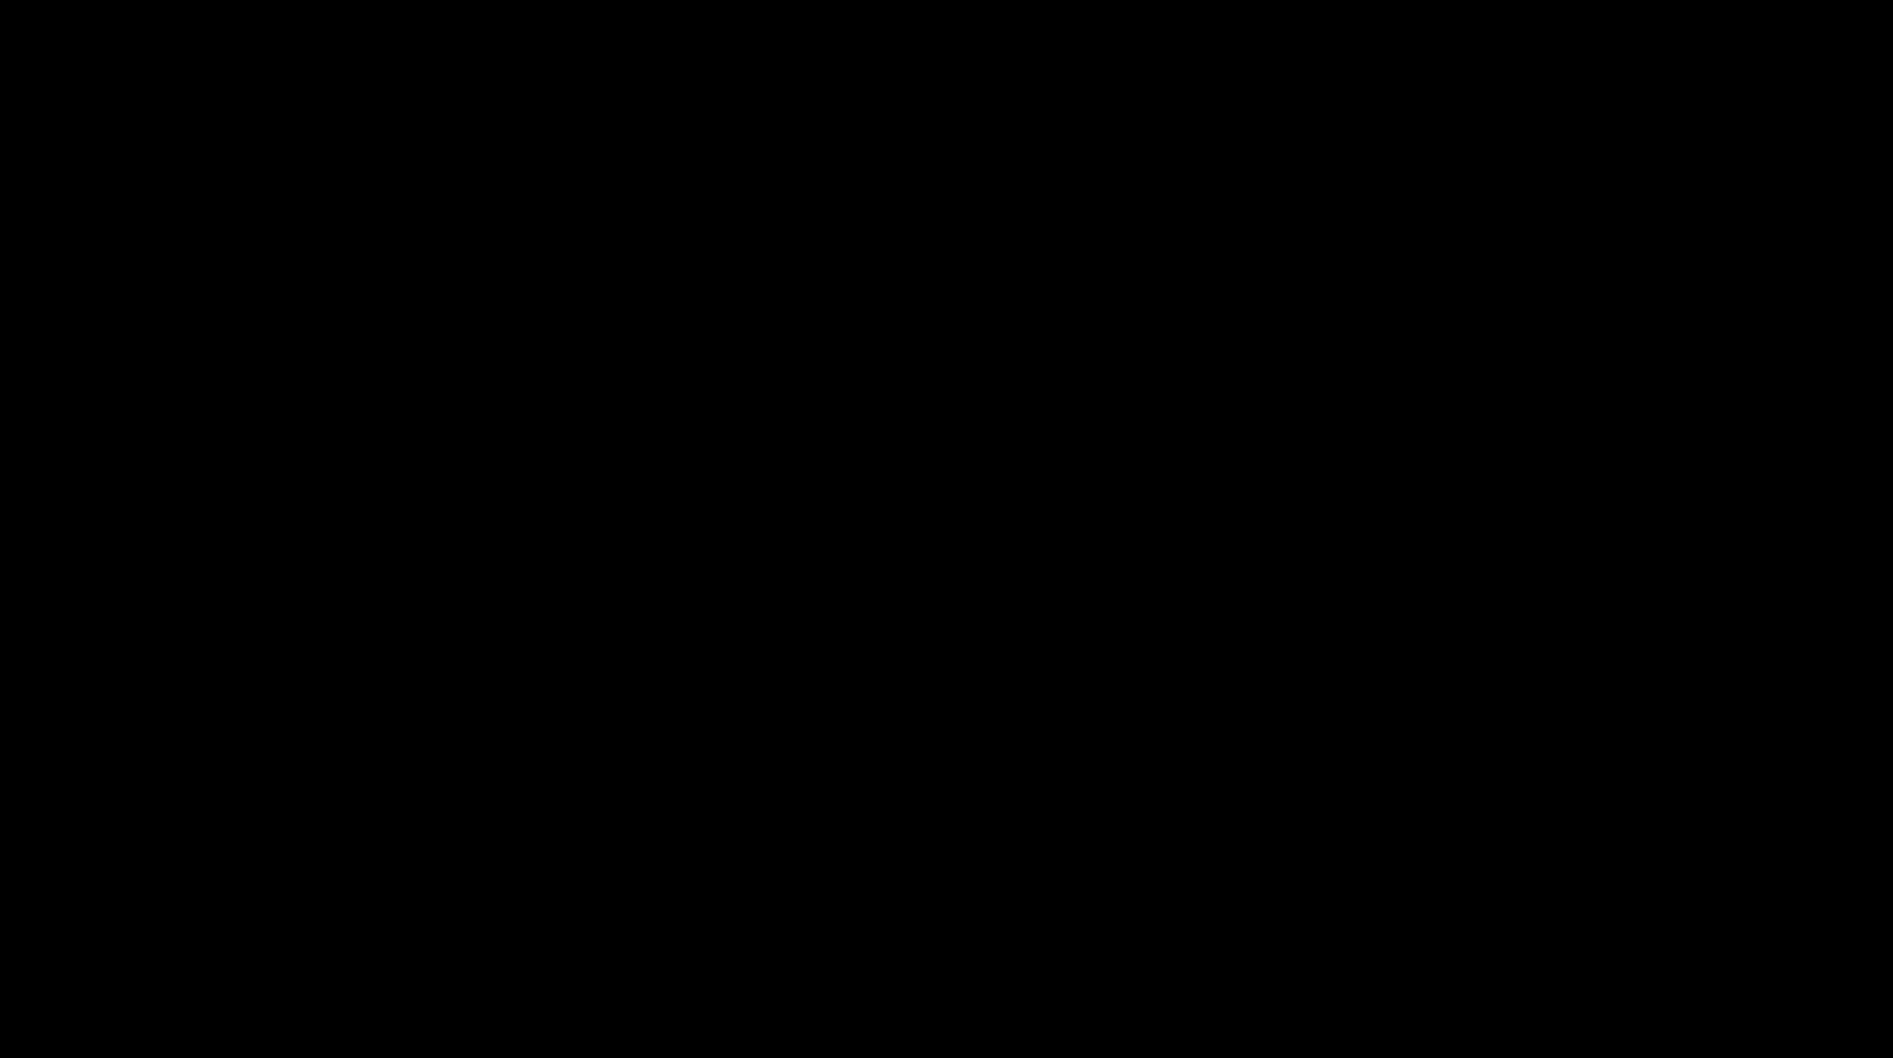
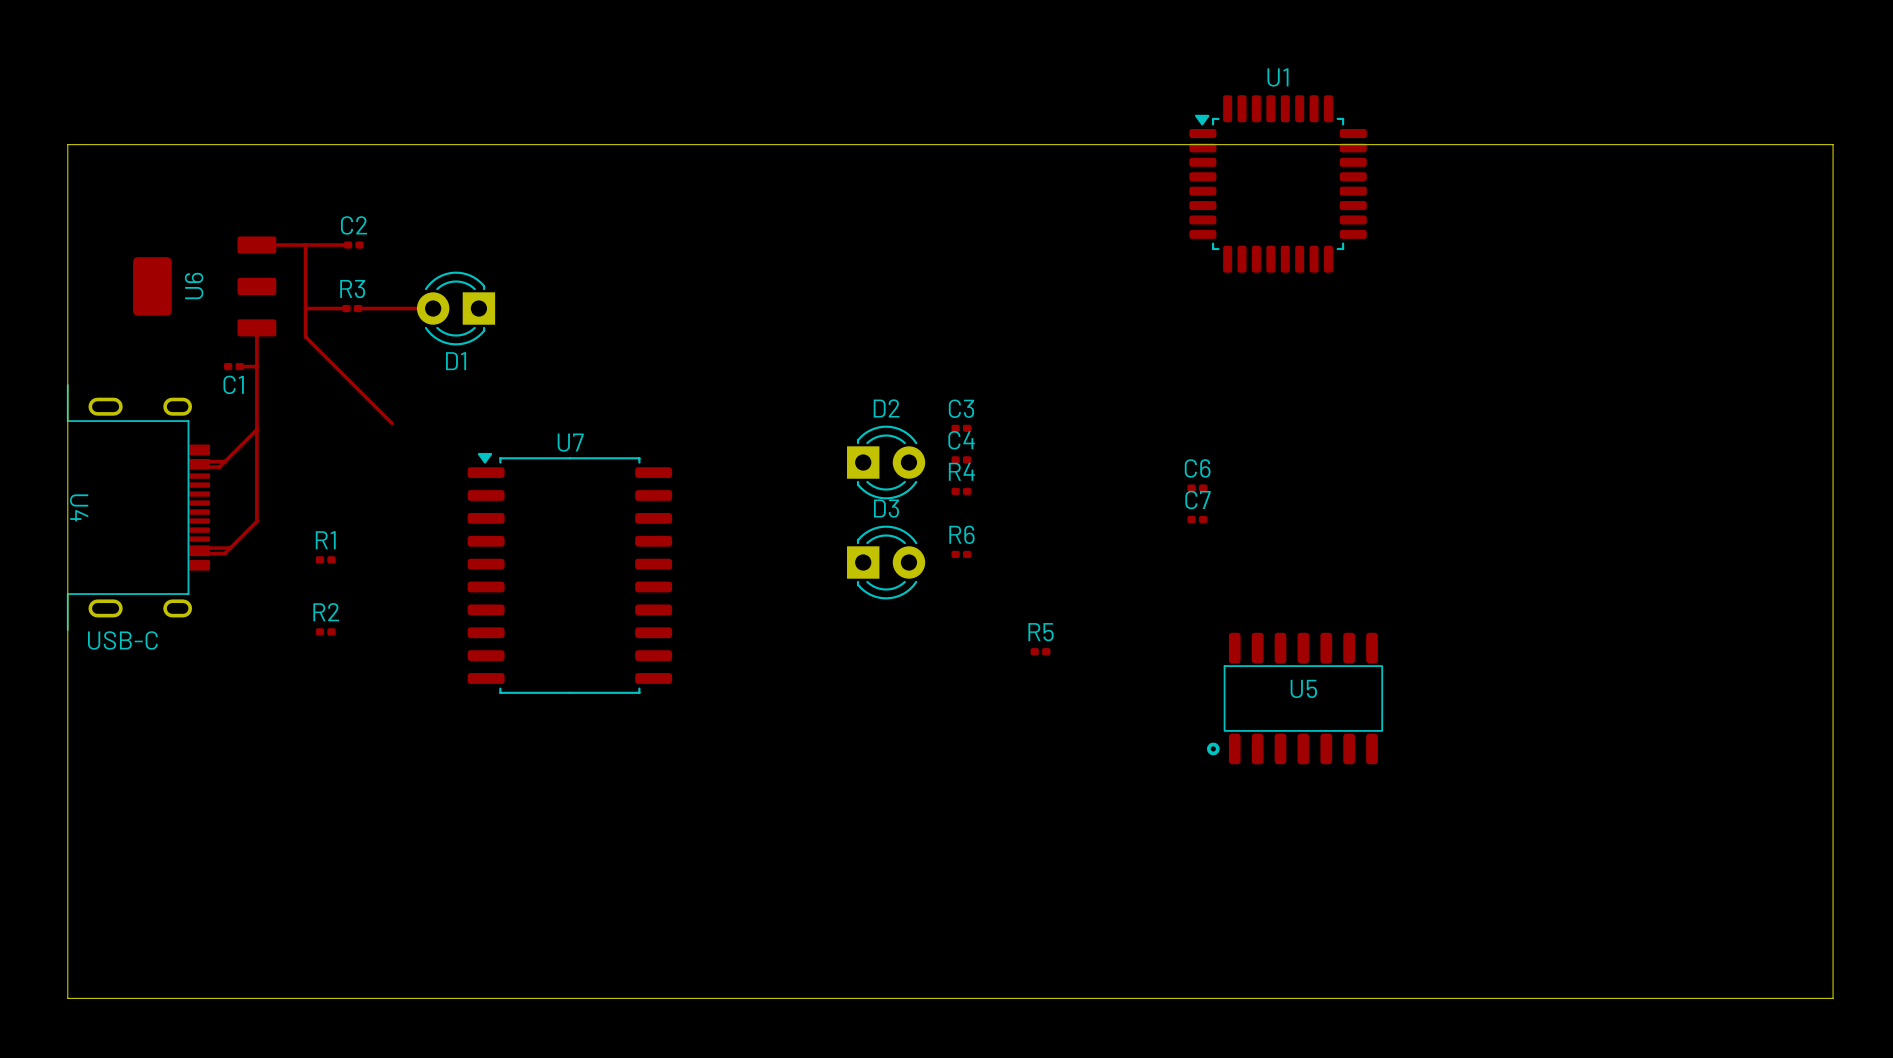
board edge: none -> (67, 144) (1833, 144) (1833, 998) (67, 998) (67, 144)
U1: none -> (1278, 183)
track: none -> (256, 245) (348, 245)
track: none -> (305, 245) (305, 336) (392, 423)
C2: none -> (353, 245)
U6: none -> (204, 286)
track: none -> (305, 308) (346, 308)
R3: none -> (352, 308)
track: none -> (358, 308) (433, 308)
D1: none -> (456, 308)
track: none -> (256, 327) (256, 521) (224, 553) (199, 553)
C1: none -> (233, 366)
track: none -> (239, 366) (256, 366)
C3: none -> (961, 428)
track: none -> (256, 429) (219, 467) (199, 467)
C4: none -> (961, 459)
track: none -> (199, 461) (224, 461)
D2: none -> (886, 462)
C6: none -> (1197, 488)
R4: none -> (961, 491)
U4: none -> (138, 507)
C7: none -> (1197, 519)
track: none -> (230, 548) (199, 548) (201, 550)
R6: none -> (961, 554)
R1: none -> (325, 559)
D3: none -> (886, 562)
U7: none -> (569, 573)
R2: none -> (325, 631)
text: none -> USB-C (122, 640)
R5: none -> (1040, 651)
U5: none -> (1295, 698)

